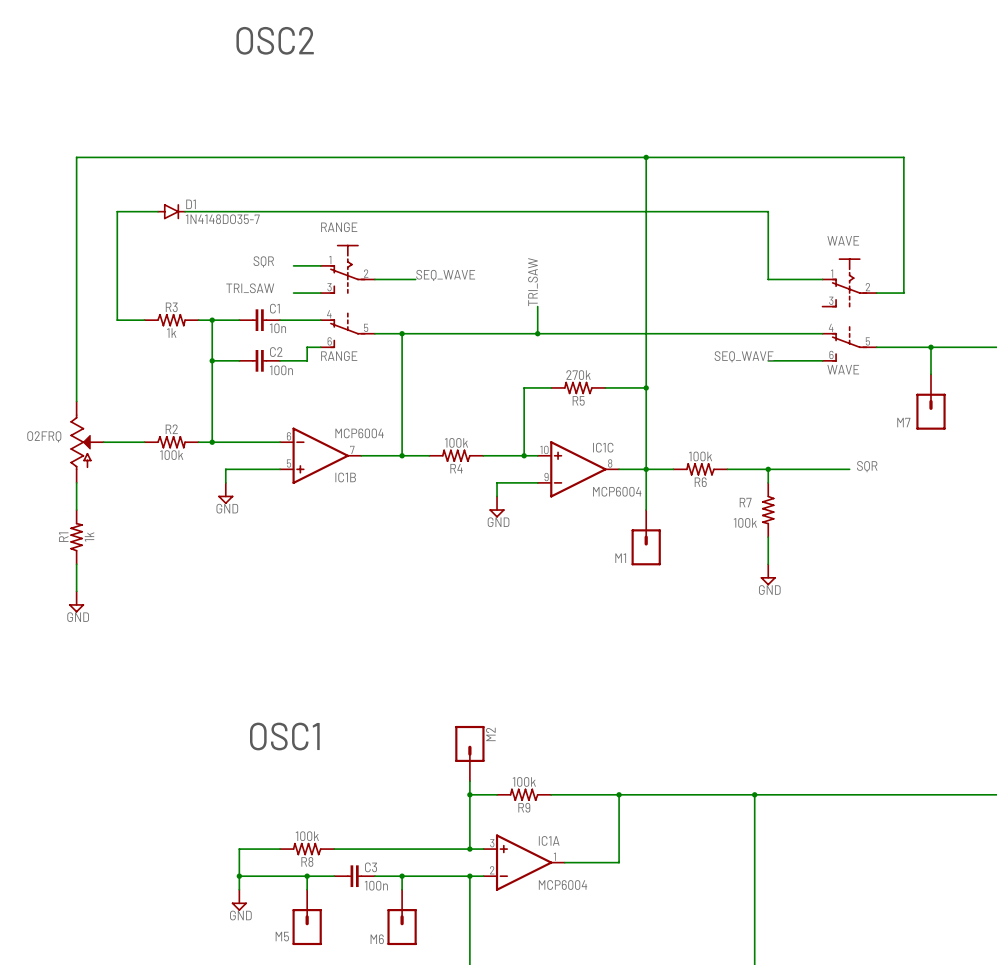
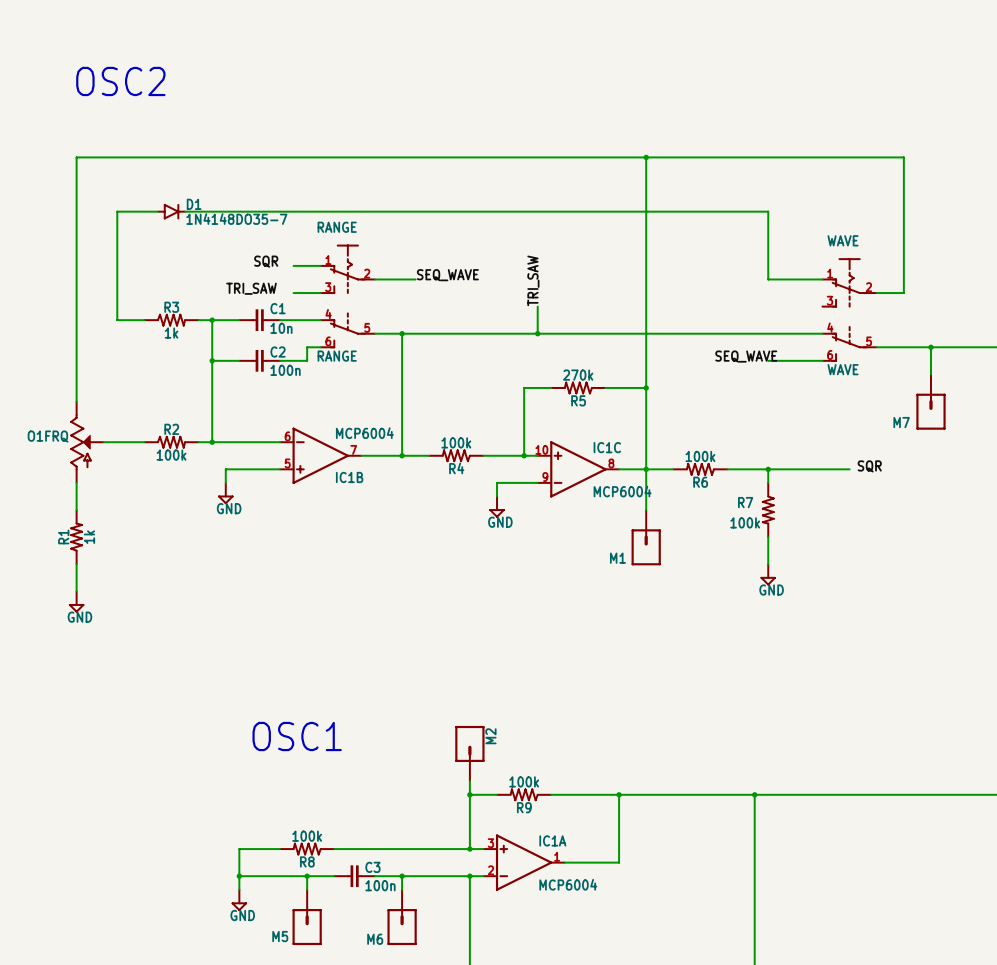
text: OSC2 (275, 40) -> none
text: none -> OSC2 (120, 81)
O2FRQ name: O2FRQ (44, 436) -> O1FRQ (48, 436)

